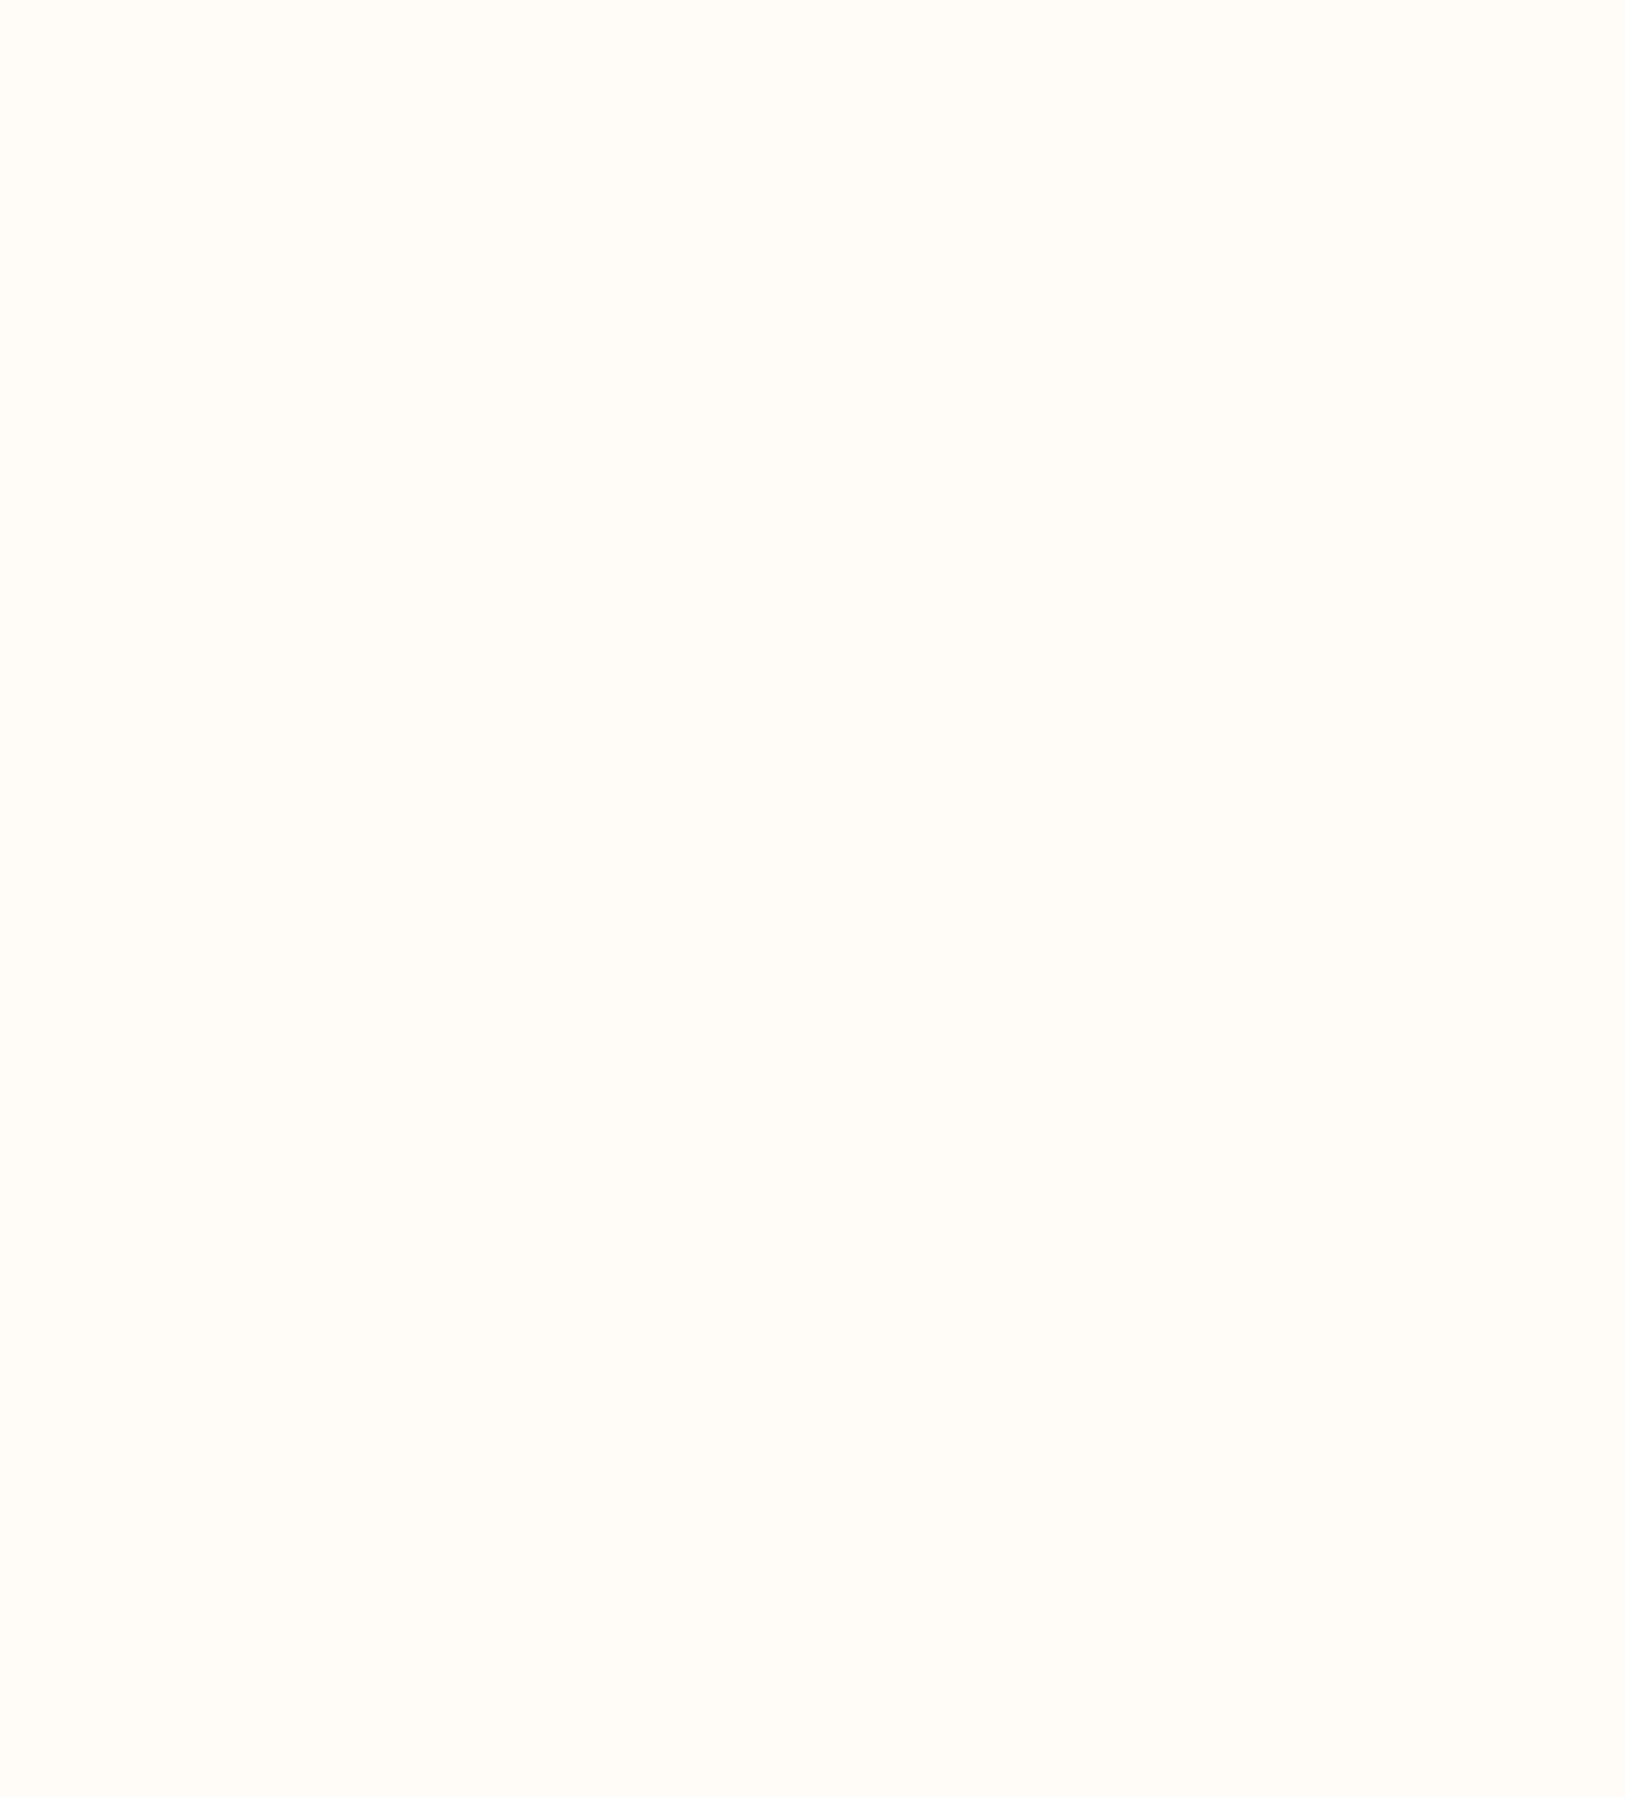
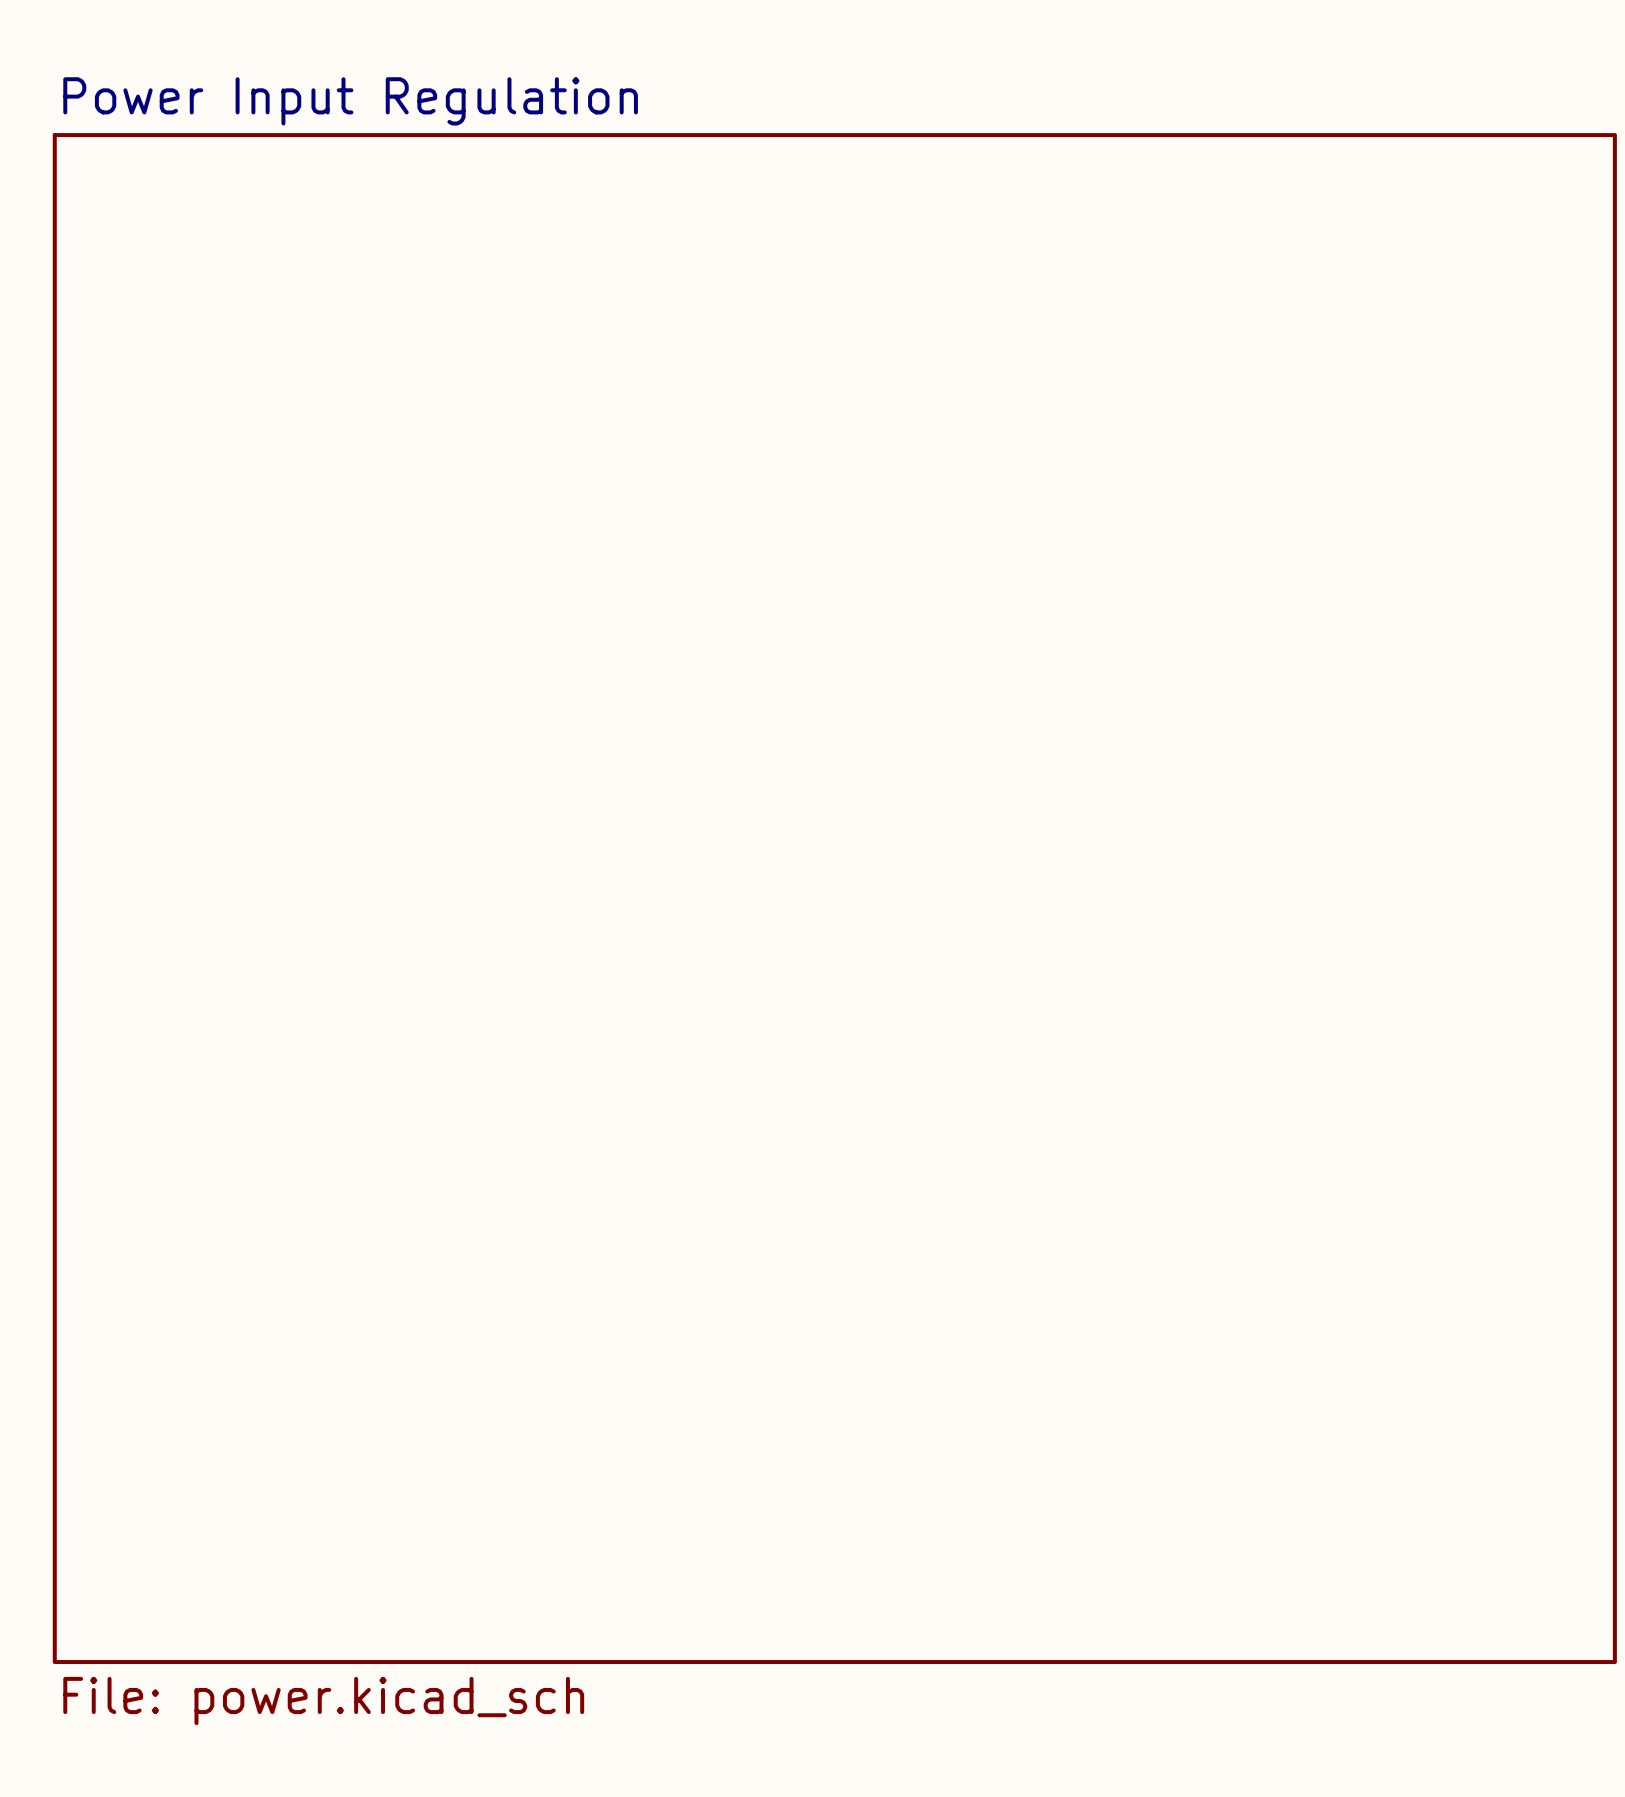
sheet Power Input Regulation: none -> File: power.kicad_sch (834, 898)

